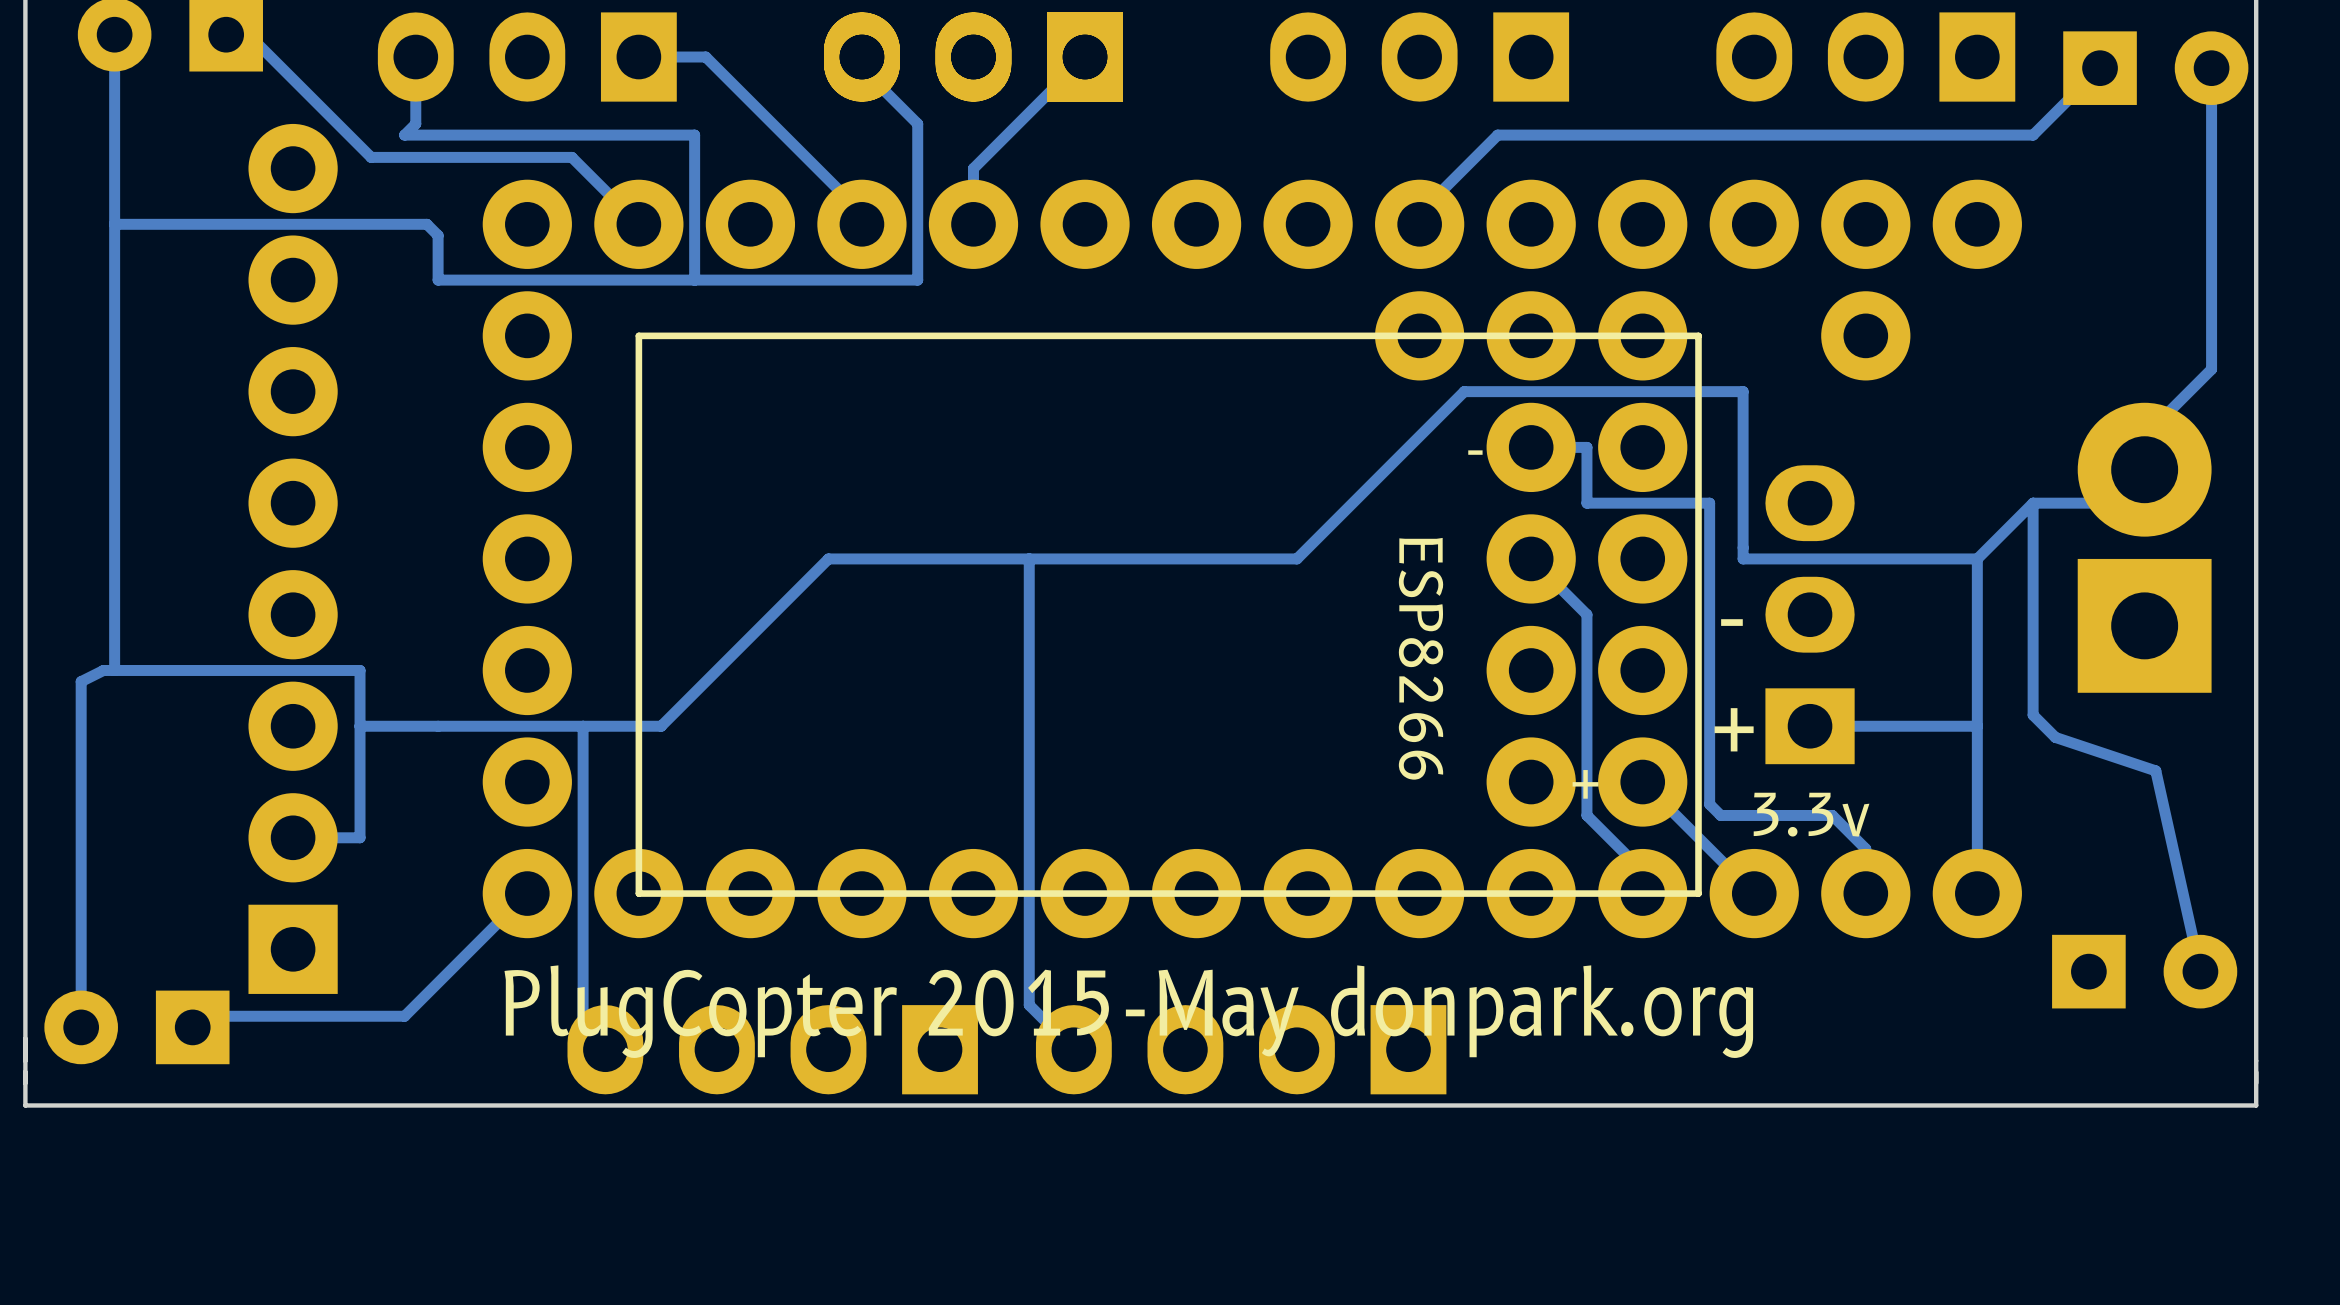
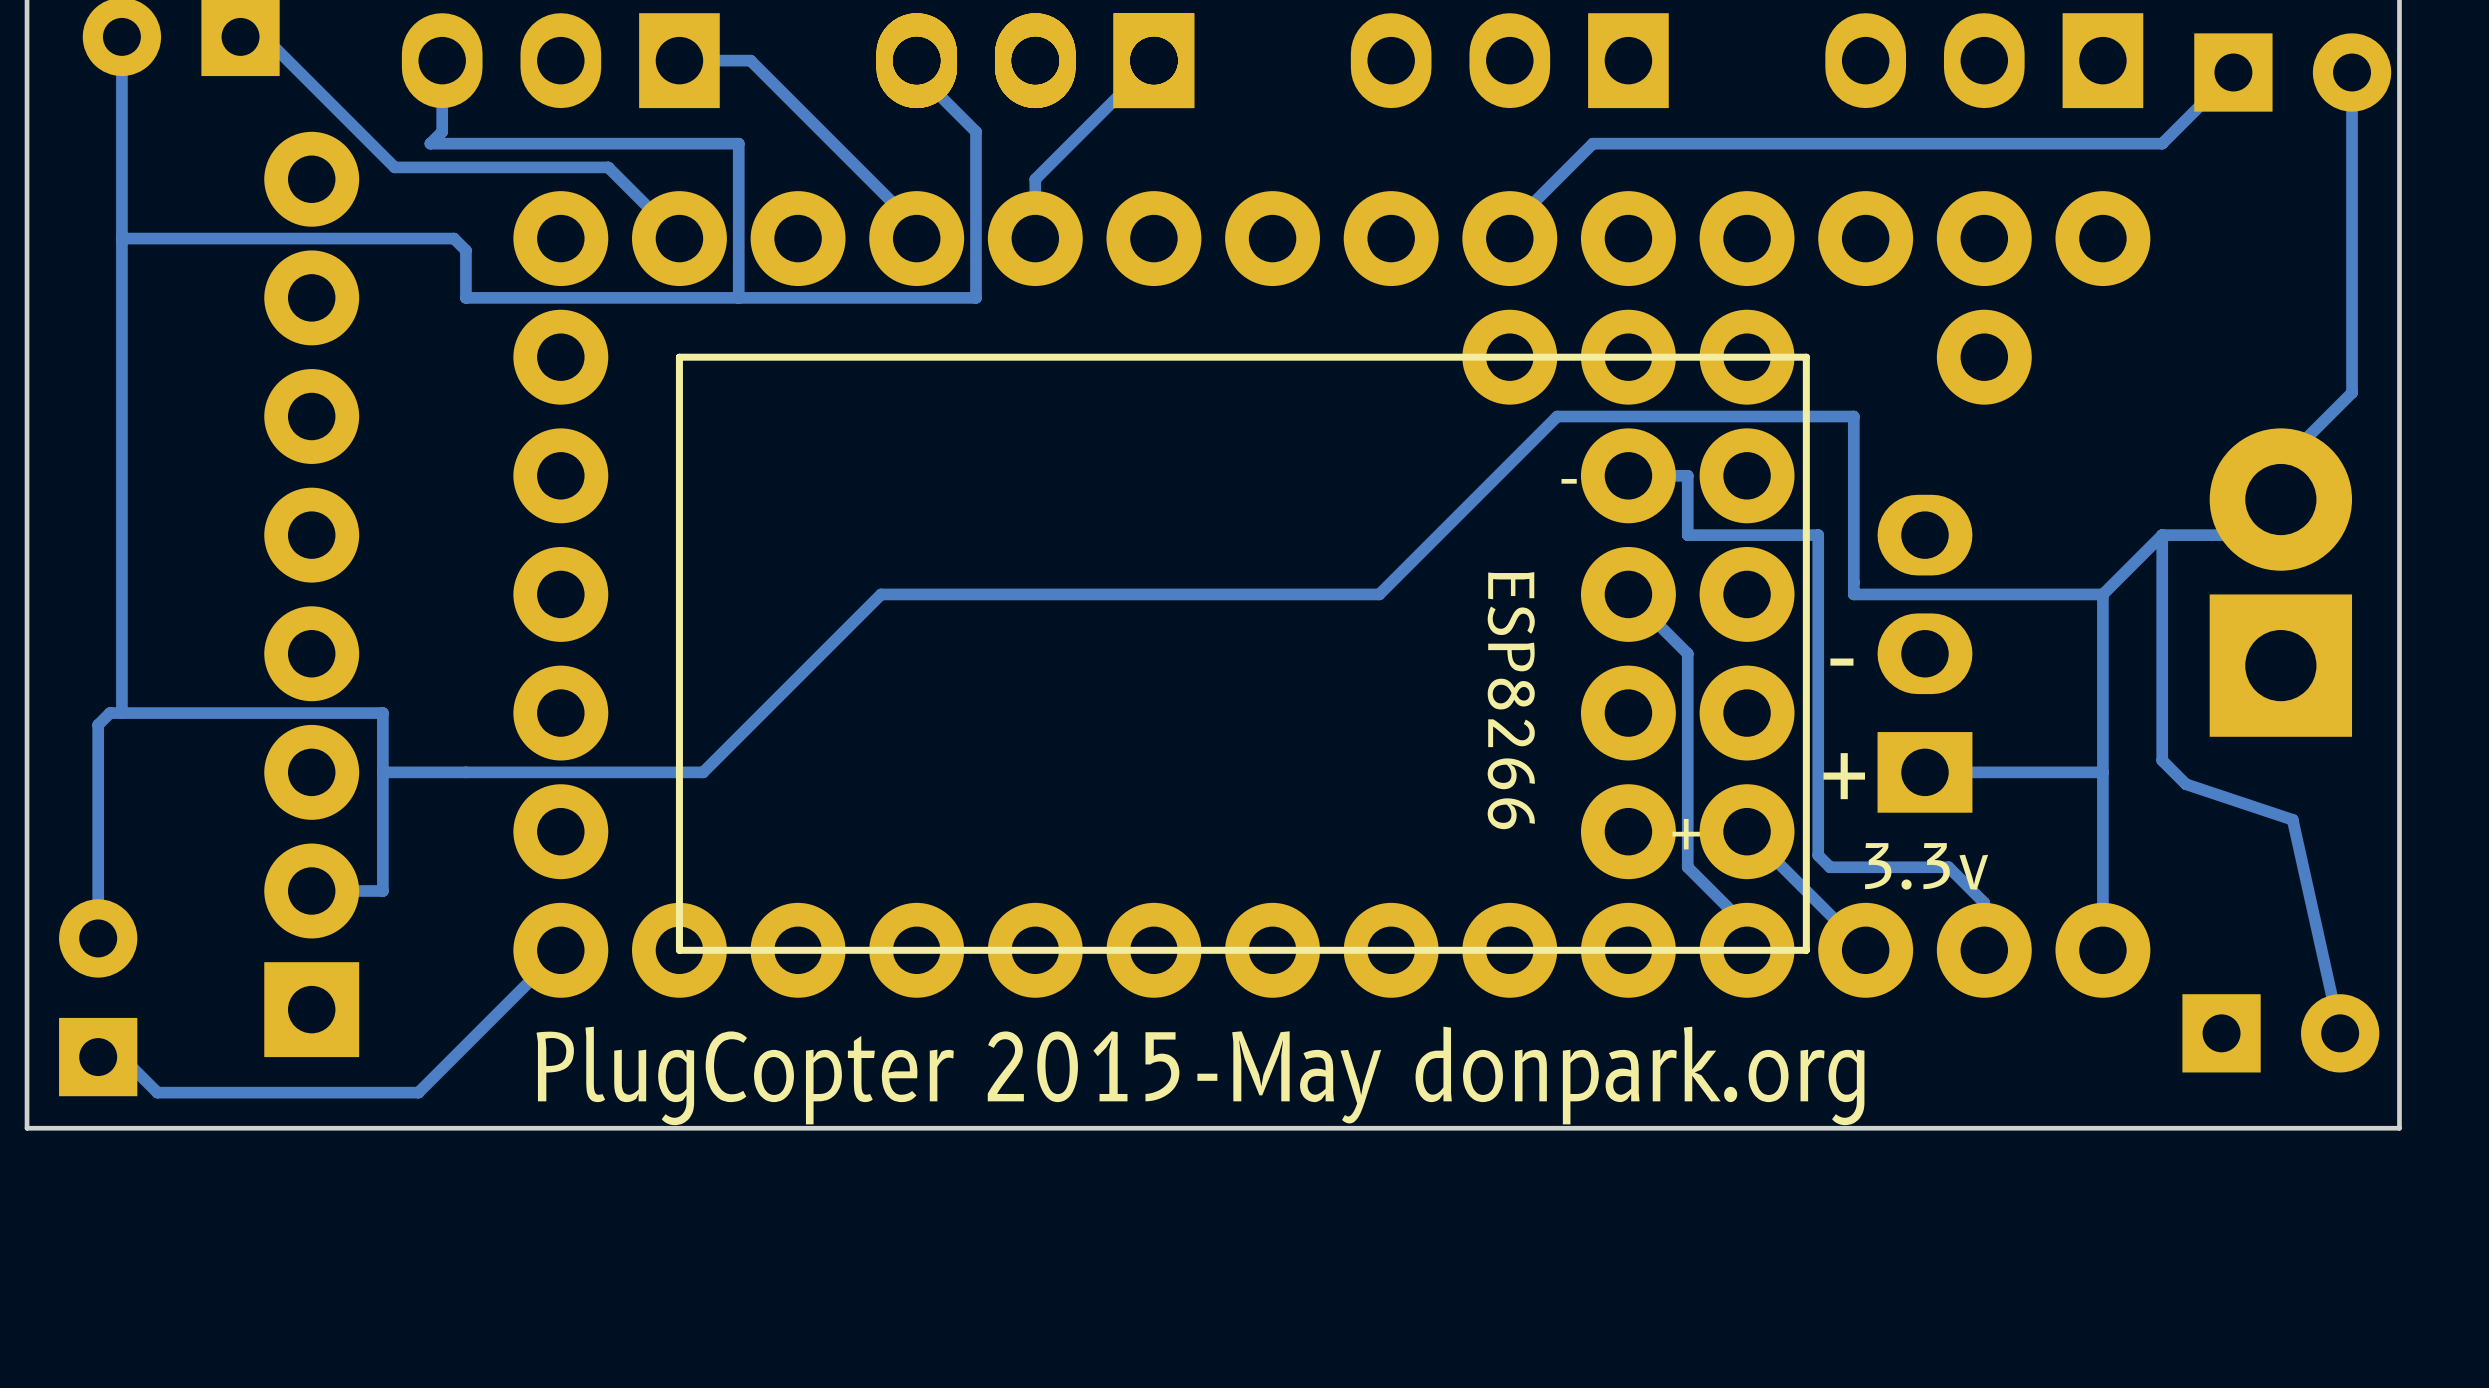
track: (1029, 558) (1029, 1005) (1073, 1049) -> none
track: (103, 670) (81, 681) (81, 1027) -> (110, 713) (98, 724) (98, 938)
track: (583, 726) (583, 1027) (605, 1049) -> none
track: (404, 1016) (203, 1016) (192, 1027) -> (430, 1080) (418, 1092) (157, 1092) (121, 1057) (98, 1057)
part rotation: 0° (136, 1027) -> 90° clockwise (98, 997)
part: (772, 1049) -> none
part: (1241, 1049) -> none
board edge: (2256, 1060) (2256, 1105) (25, 1105) (25, 1060) -> (2399, 1128) (27, 1128)

